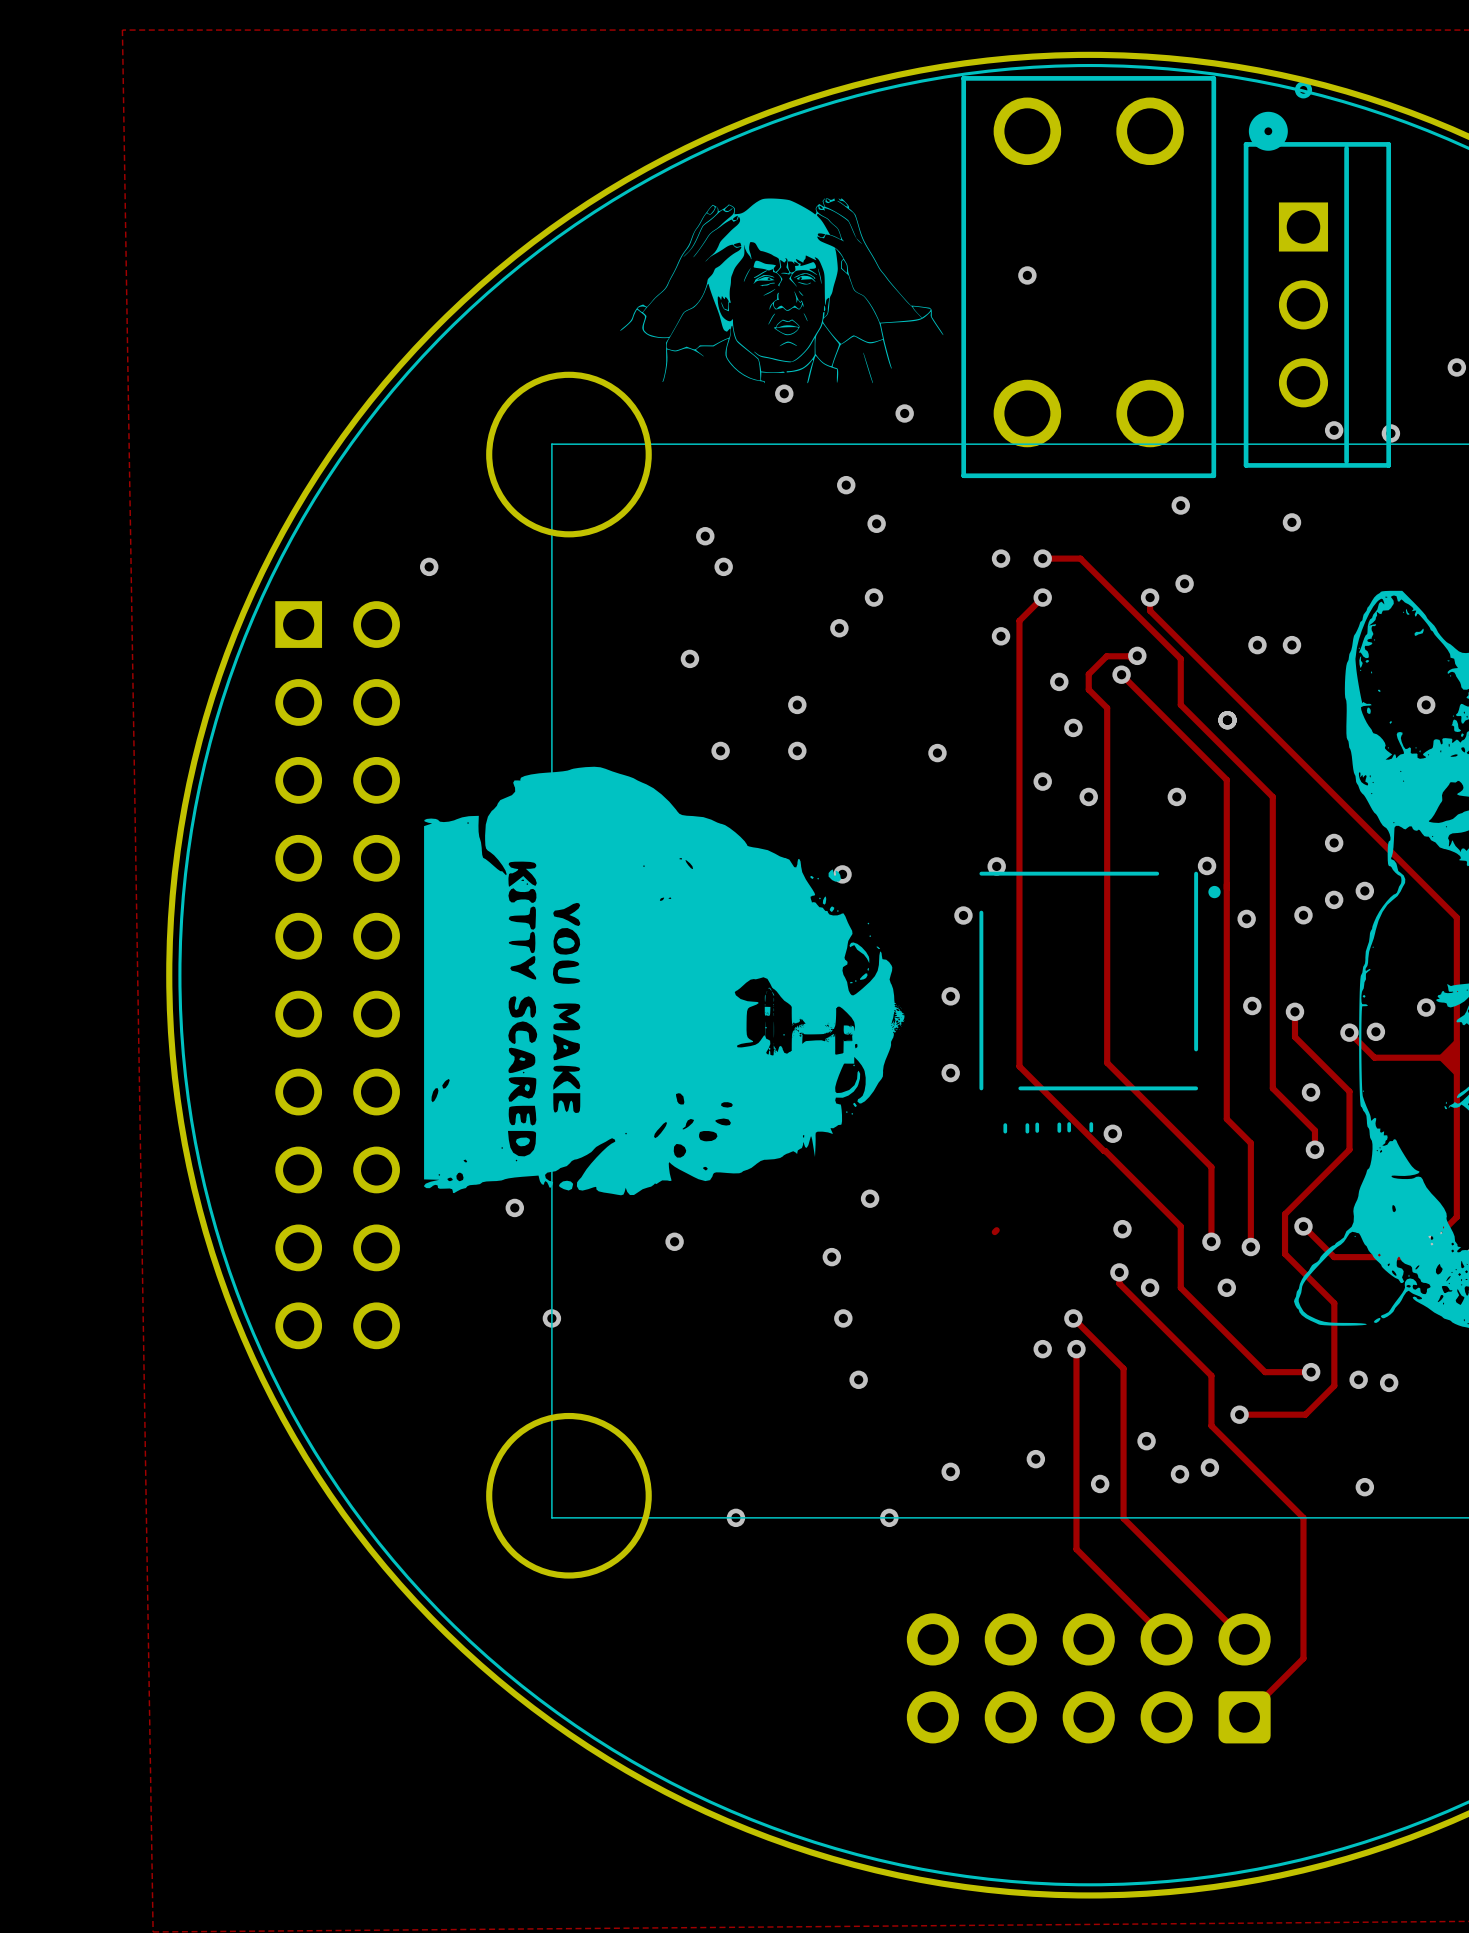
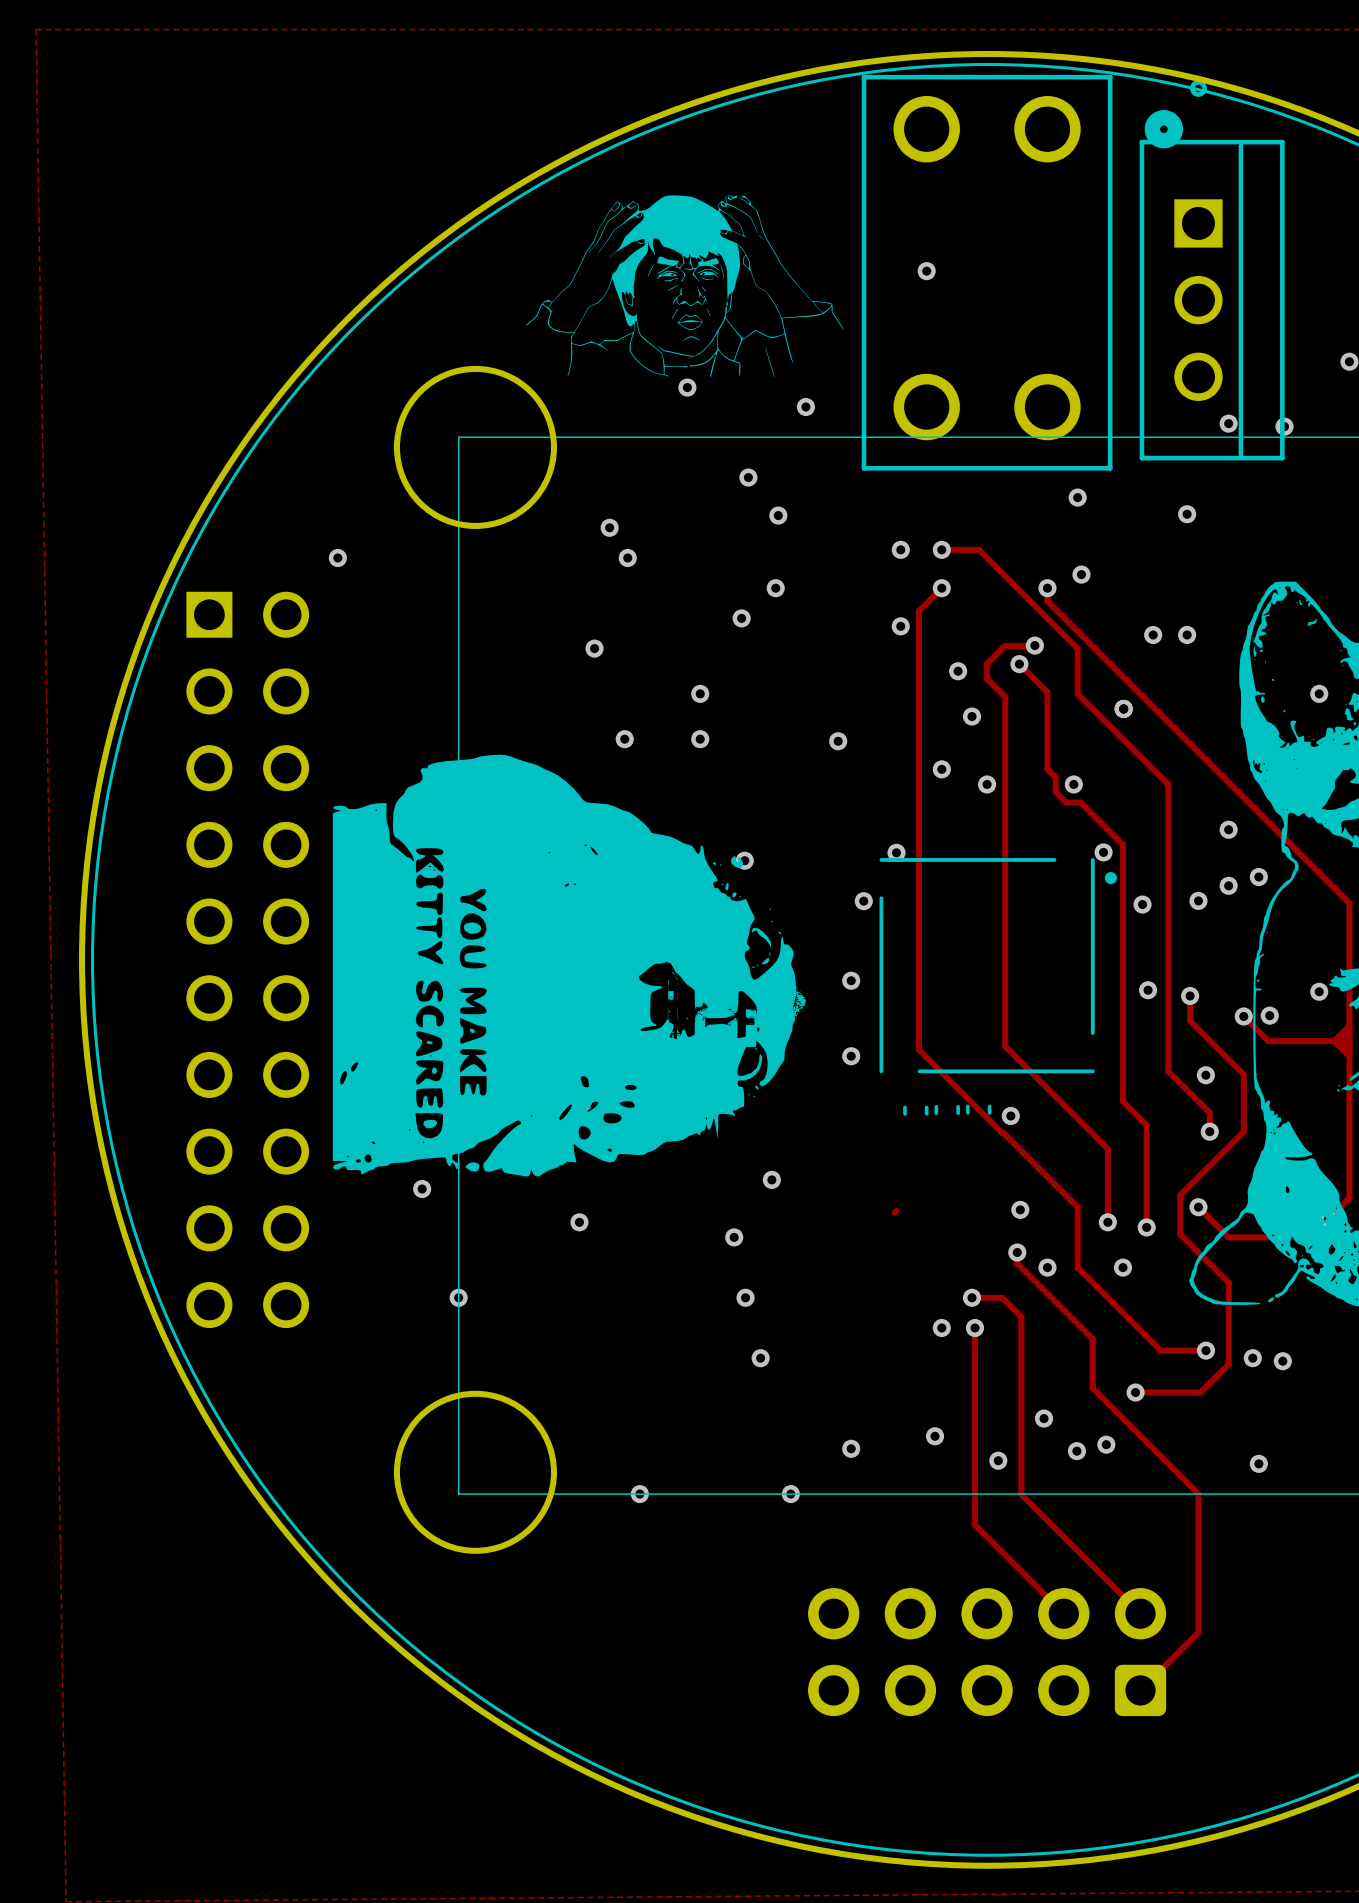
track: (1150, 703) (1226, 779) (1226, 858) -> (1047, 692) (1047, 769) (1055, 777) (1055, 791) (1066, 802) (1080, 802) (1122, 844)
track: (1073, 1318) (1123, 1368) -> (972, 1297) (1002, 1297) (1021, 1316) (1021, 1347)
track: (1196, 1360) (1211, 1375) (1211, 1425) -> (1092, 1339) (1092, 1388) (1107, 1403)

